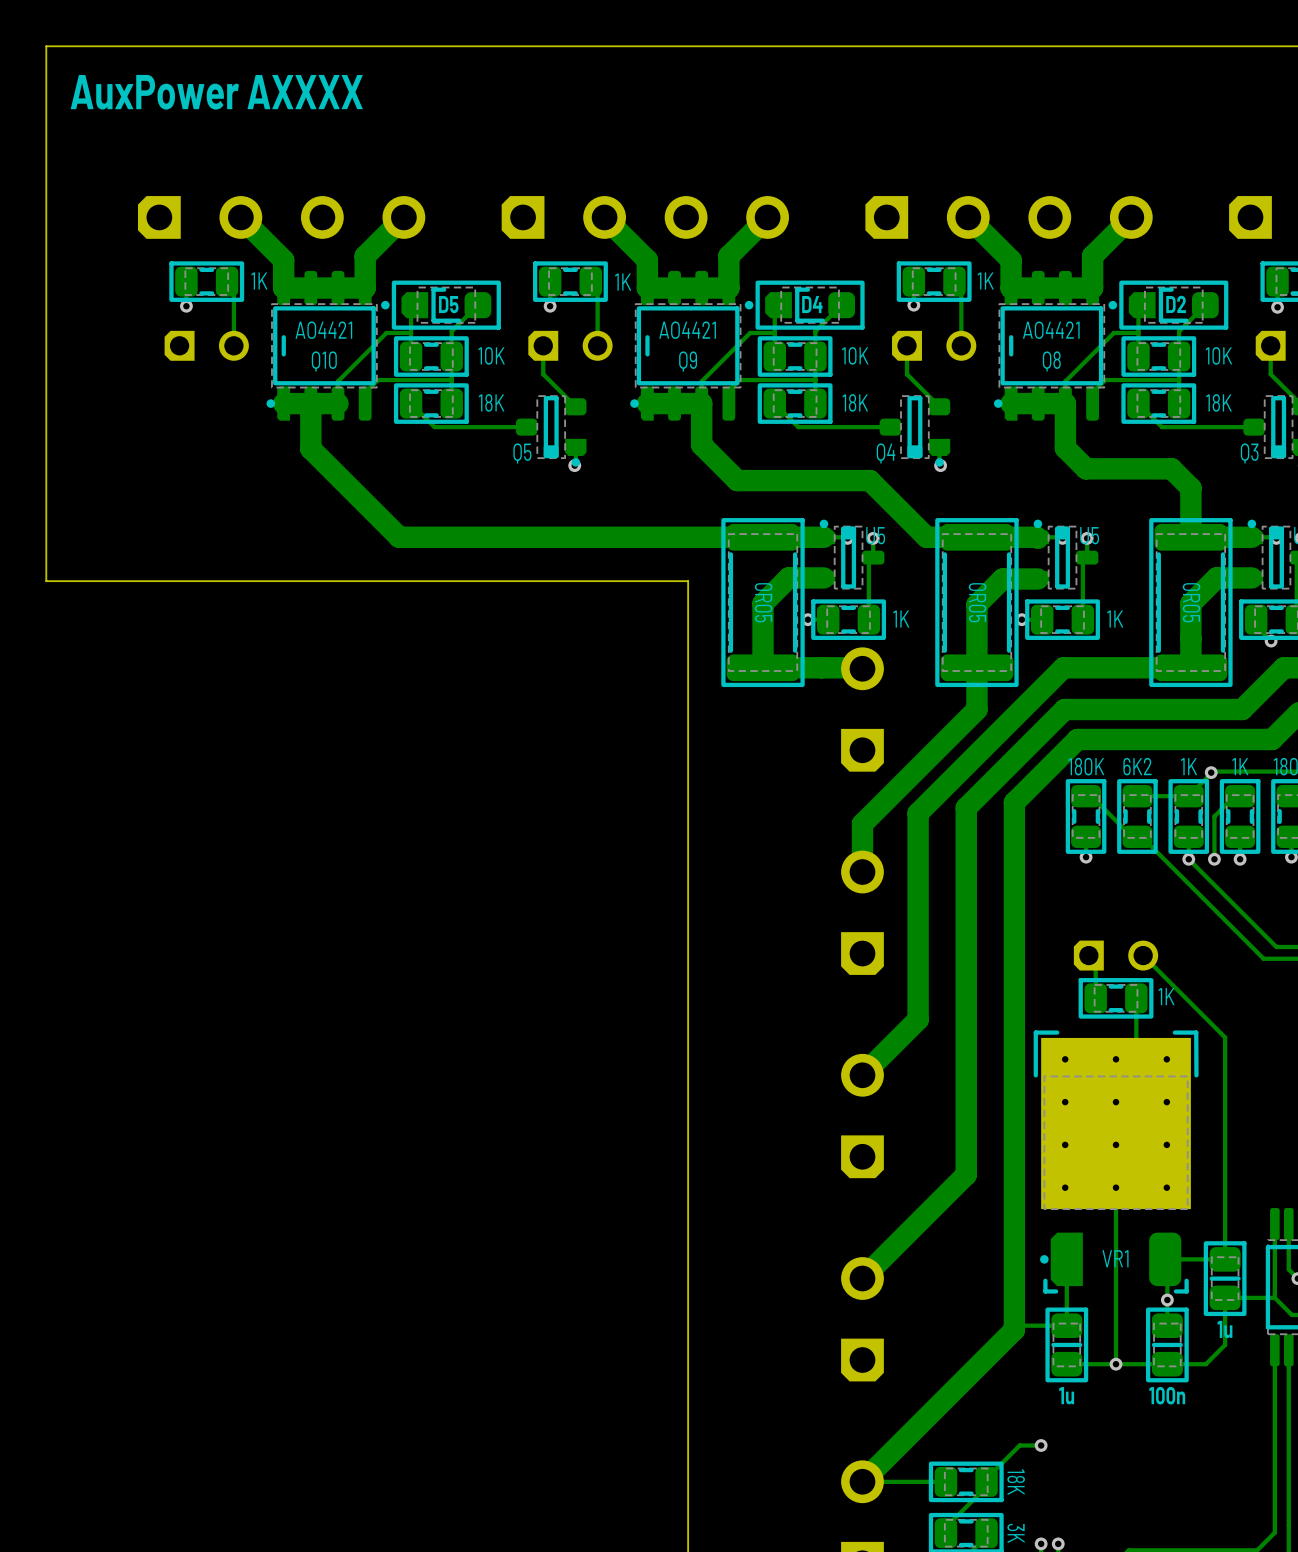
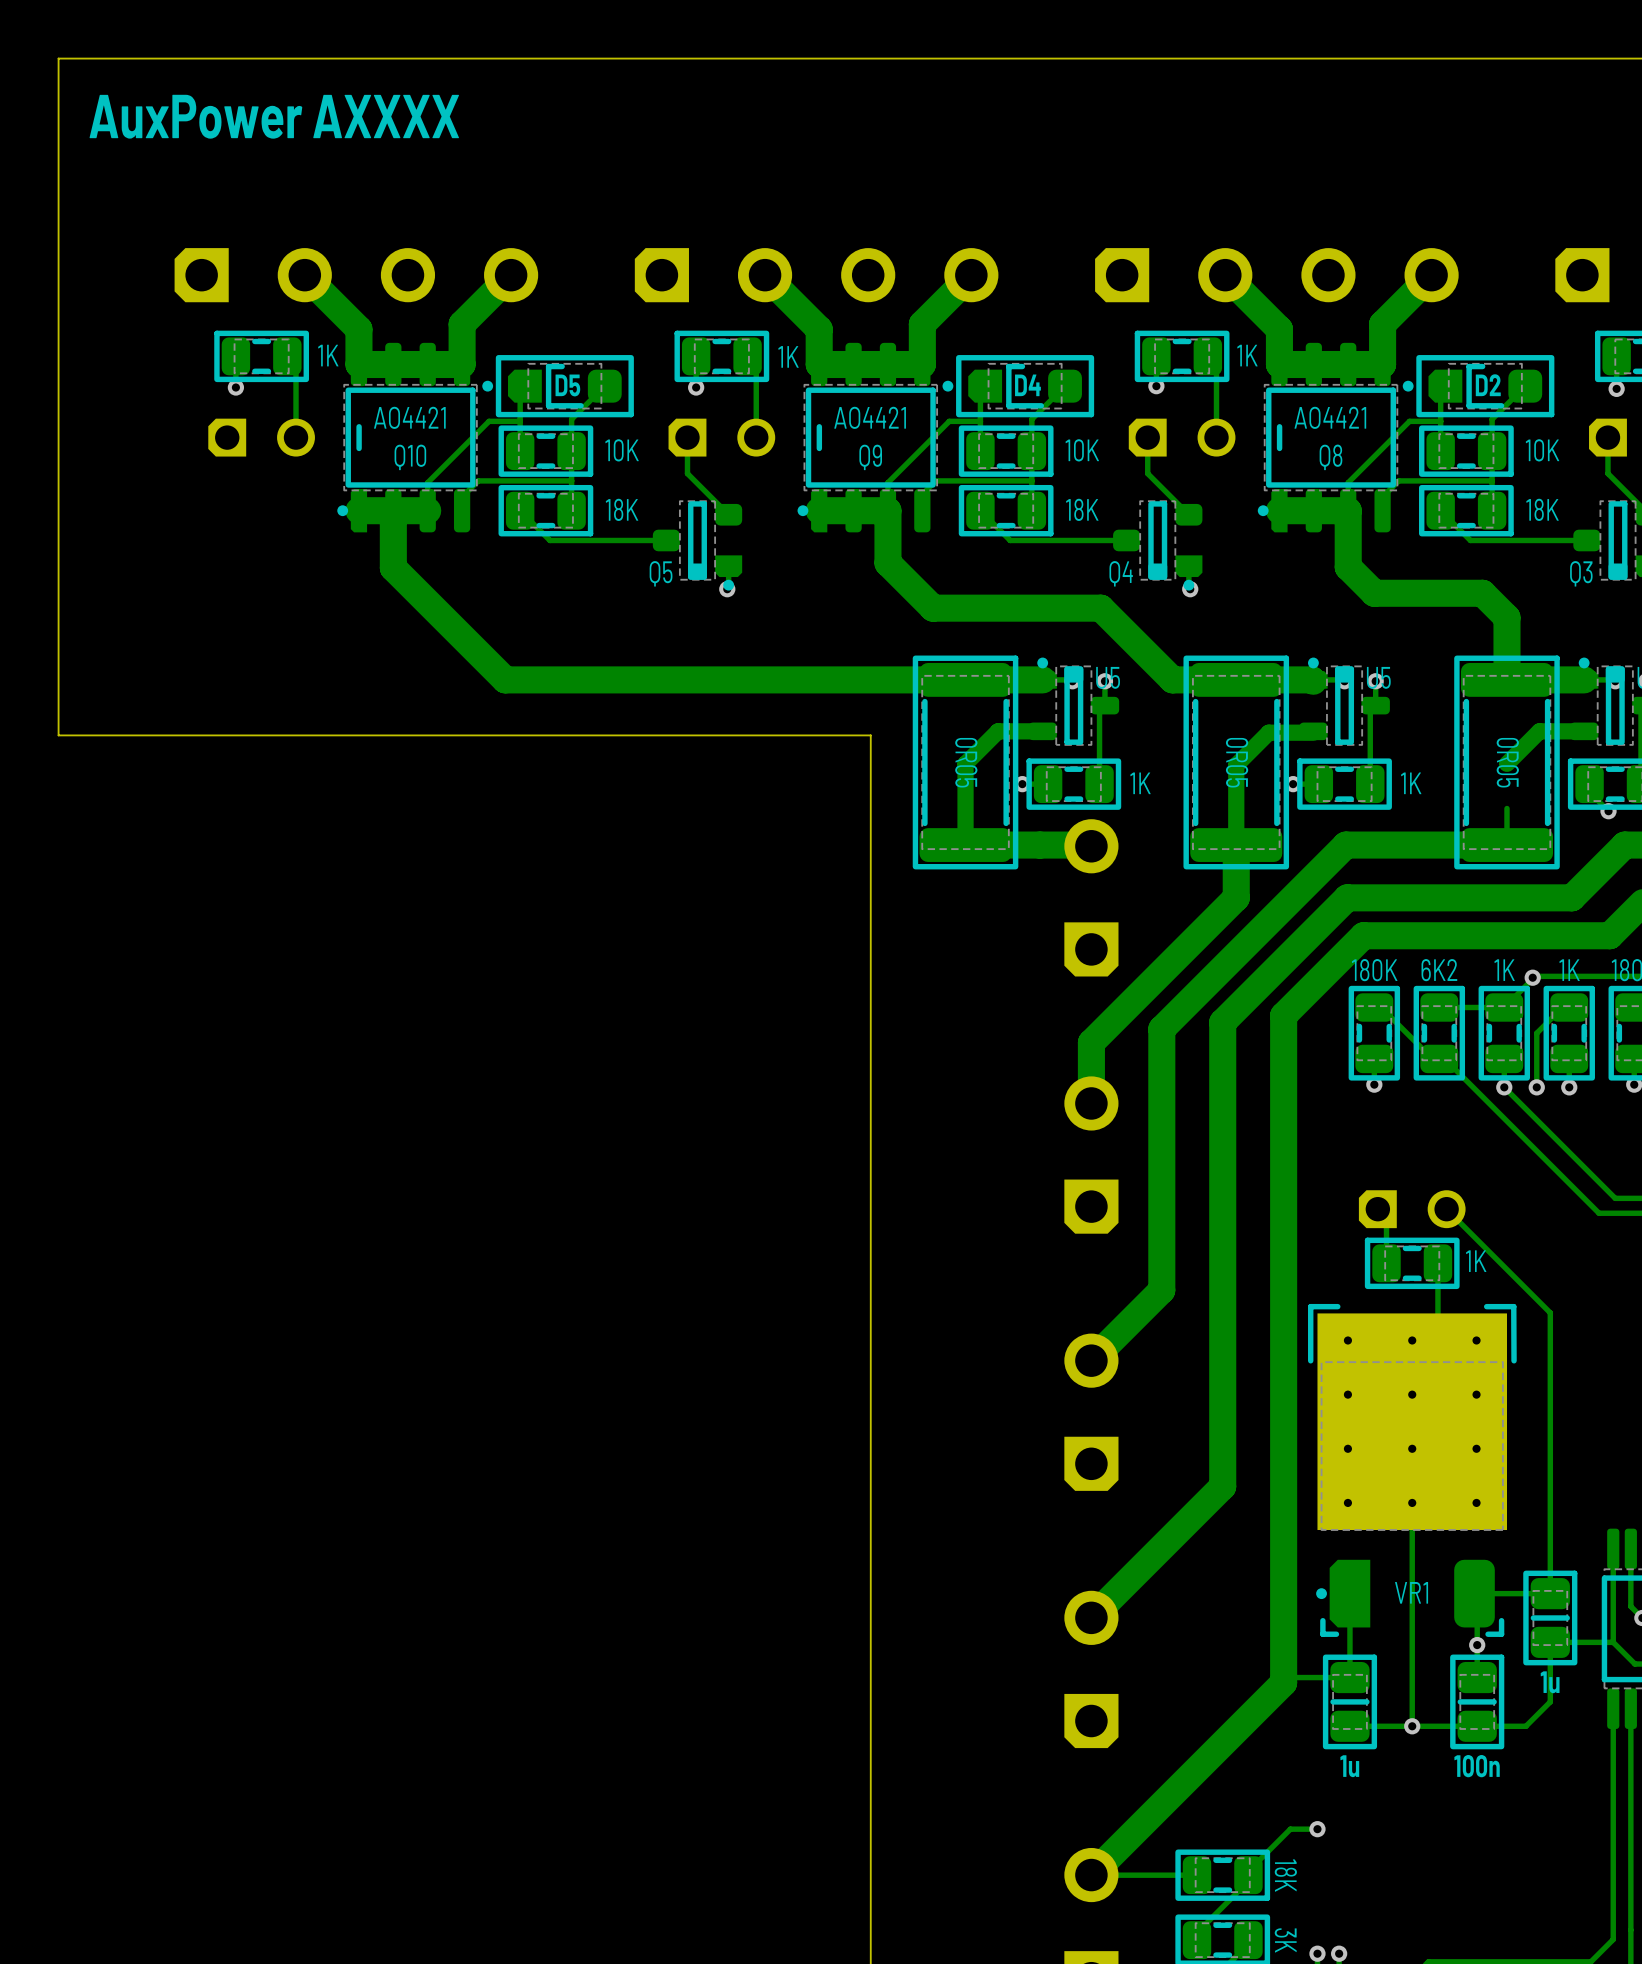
track width: thick (823, 577) (788, 577) (763, 603) (763, 667) -> thin (1042, 731) (998, 731) (965, 763) (965, 845)
track width: thick (1251, 577) (1216, 577) (1190, 603) -> thin (1584, 731) (1539, 731) (1506, 763)
track width: thick (1037, 579) (1002, 579) (976, 604) (976, 667) -> thin (1313, 732) (1268, 732) (1236, 765) (1236, 845)
track: (1190, 603) (1190, 667) -> none

